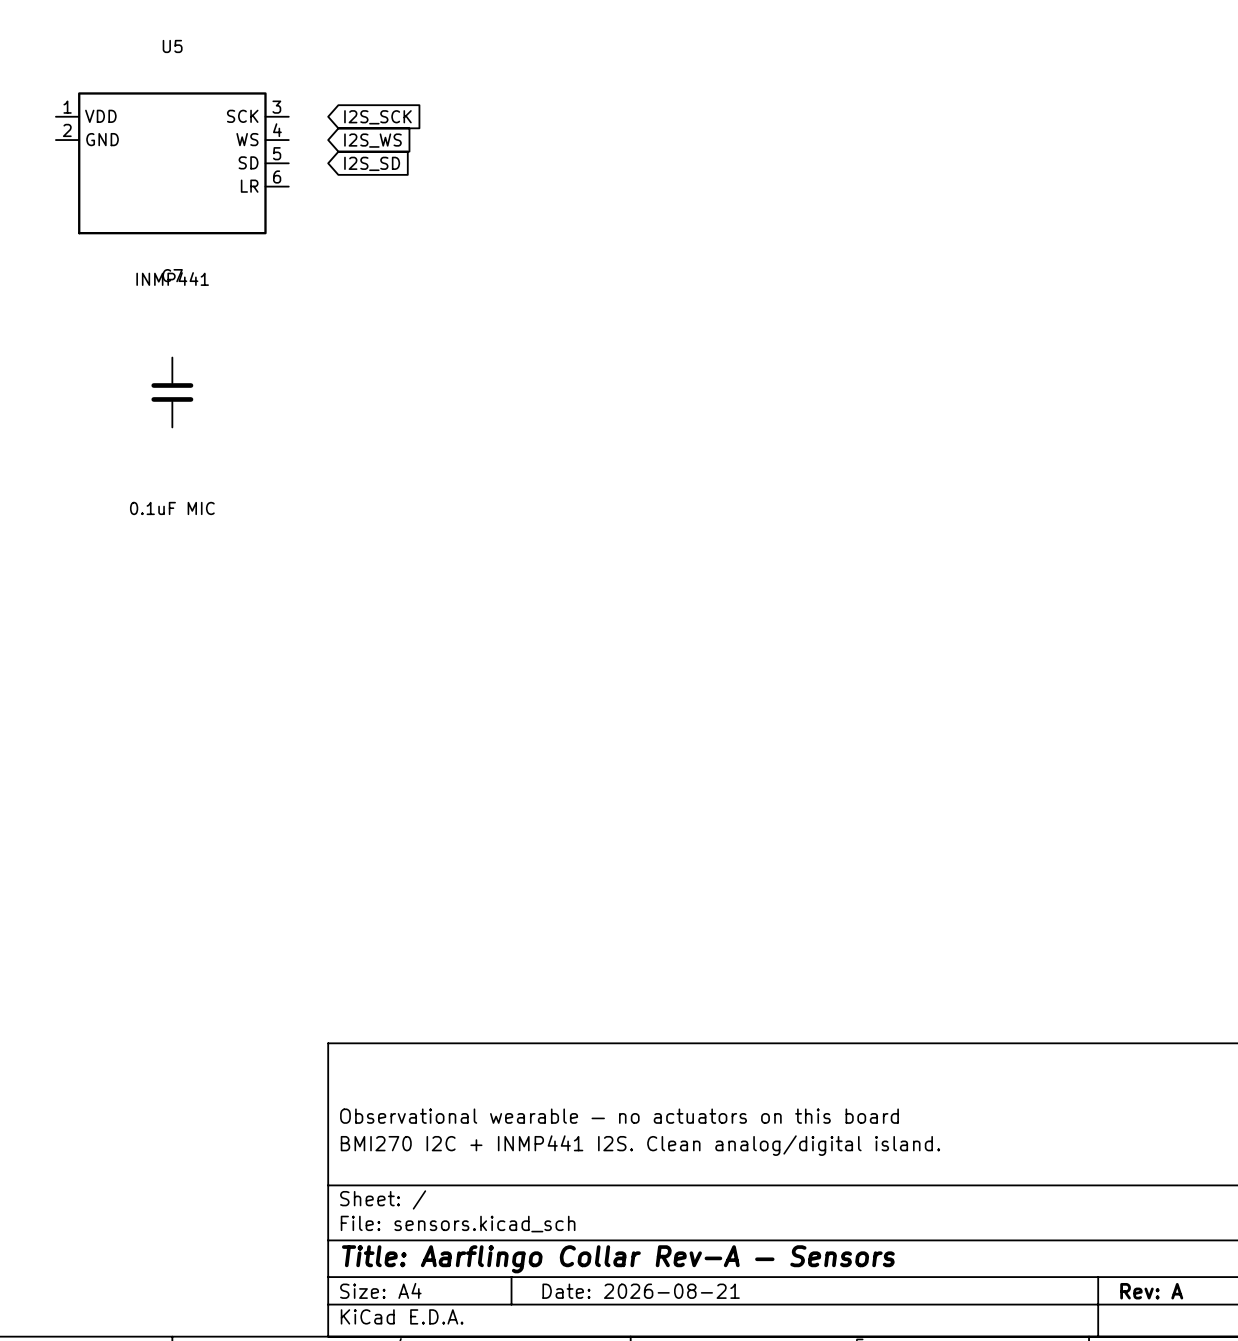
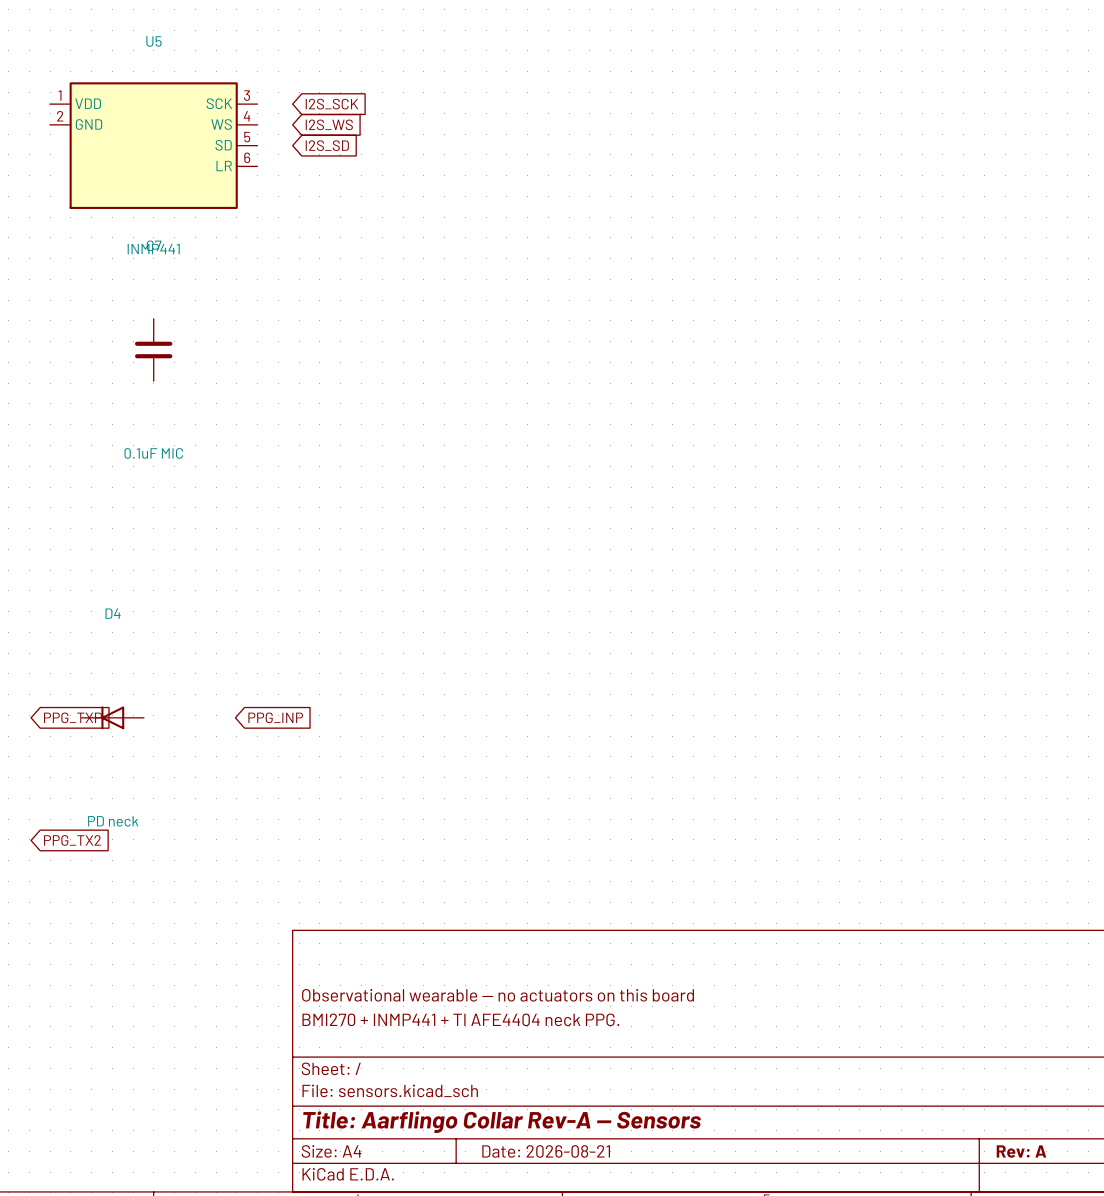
D4: none -> PD neck (112, 717)
global label: none -> PPG_TXP (73, 717)
global label: none -> PPG_INP (275, 717)
global label: none -> PPG_TX2 (72, 840)
title block: BMI270 I2C + INMP441 I2S. Clean analog/digital island. (640, 1145) -> BMI270 + INMP441 + TI AFE4404 neck PPG. (460, 1019)

